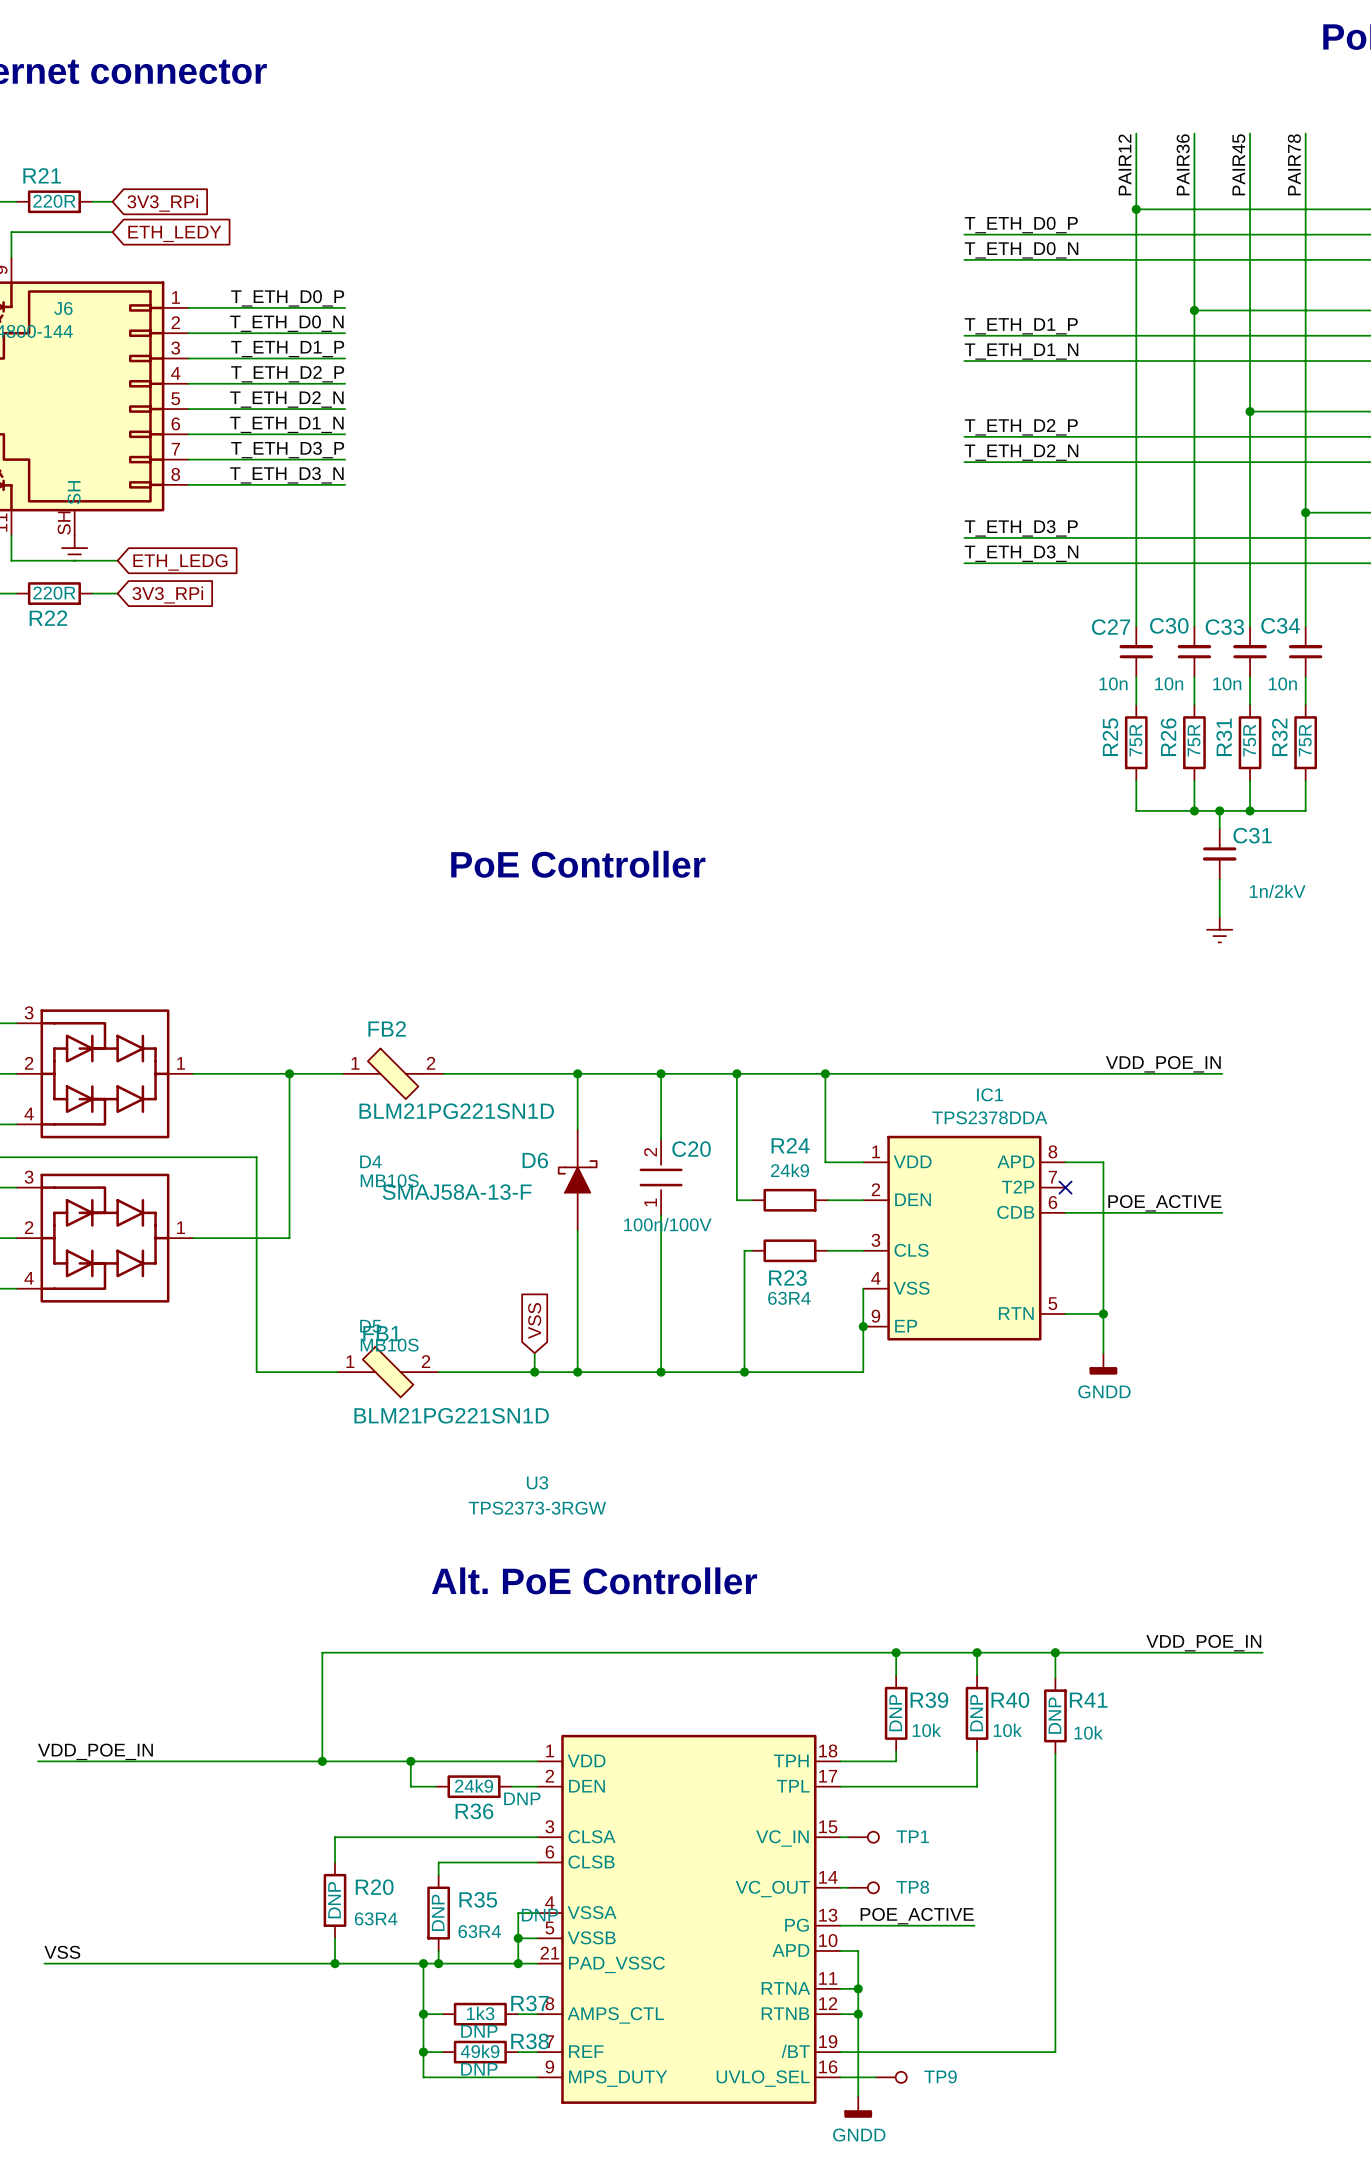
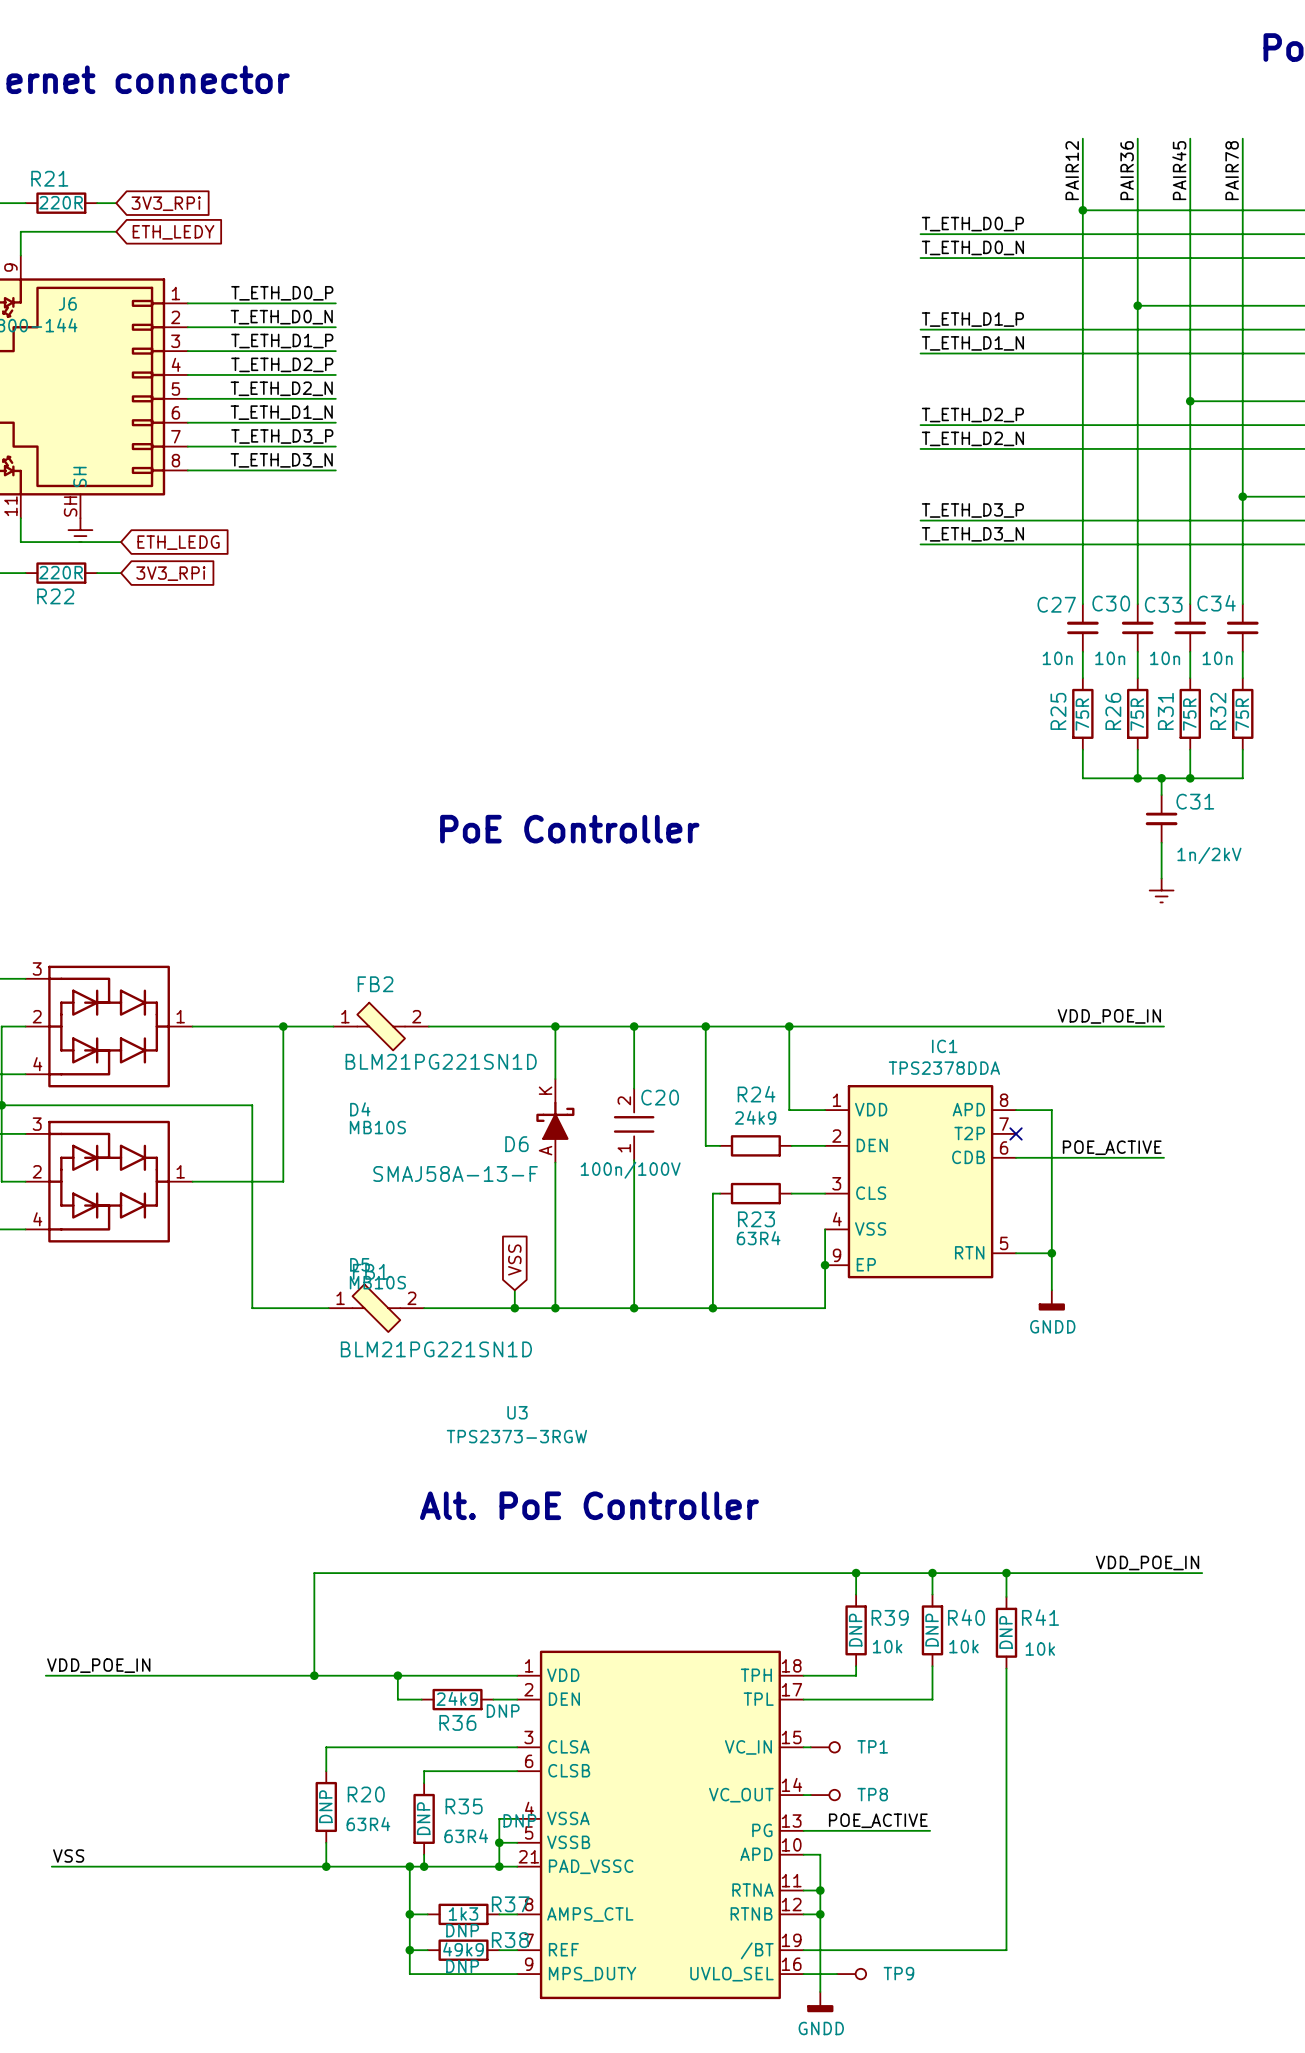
D6 symbol: [558, 1129, 597, 1231] -> [536, 1079, 575, 1163]
D6 name position: D6 (535, 1160) -> D6 (516, 1144)
D6 value position: SMAJ58A-13-F (457, 1192) -> SMAJ58A-13-F (455, 1173)

